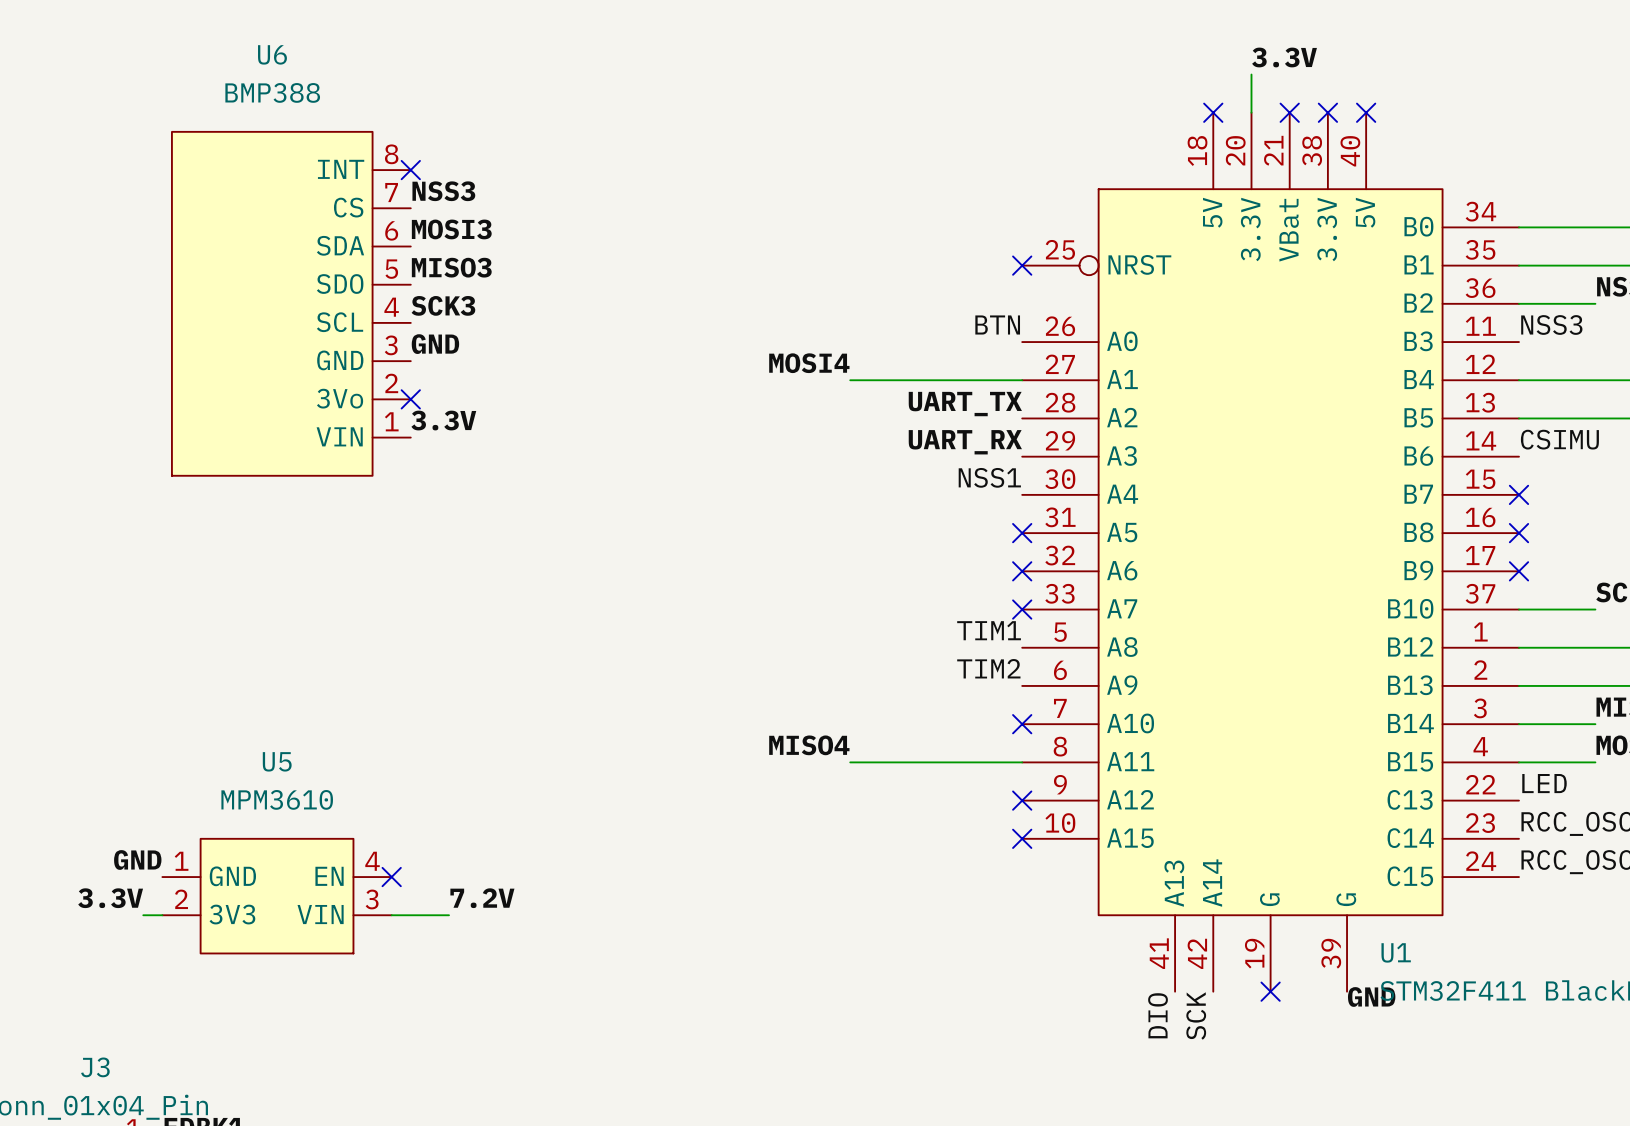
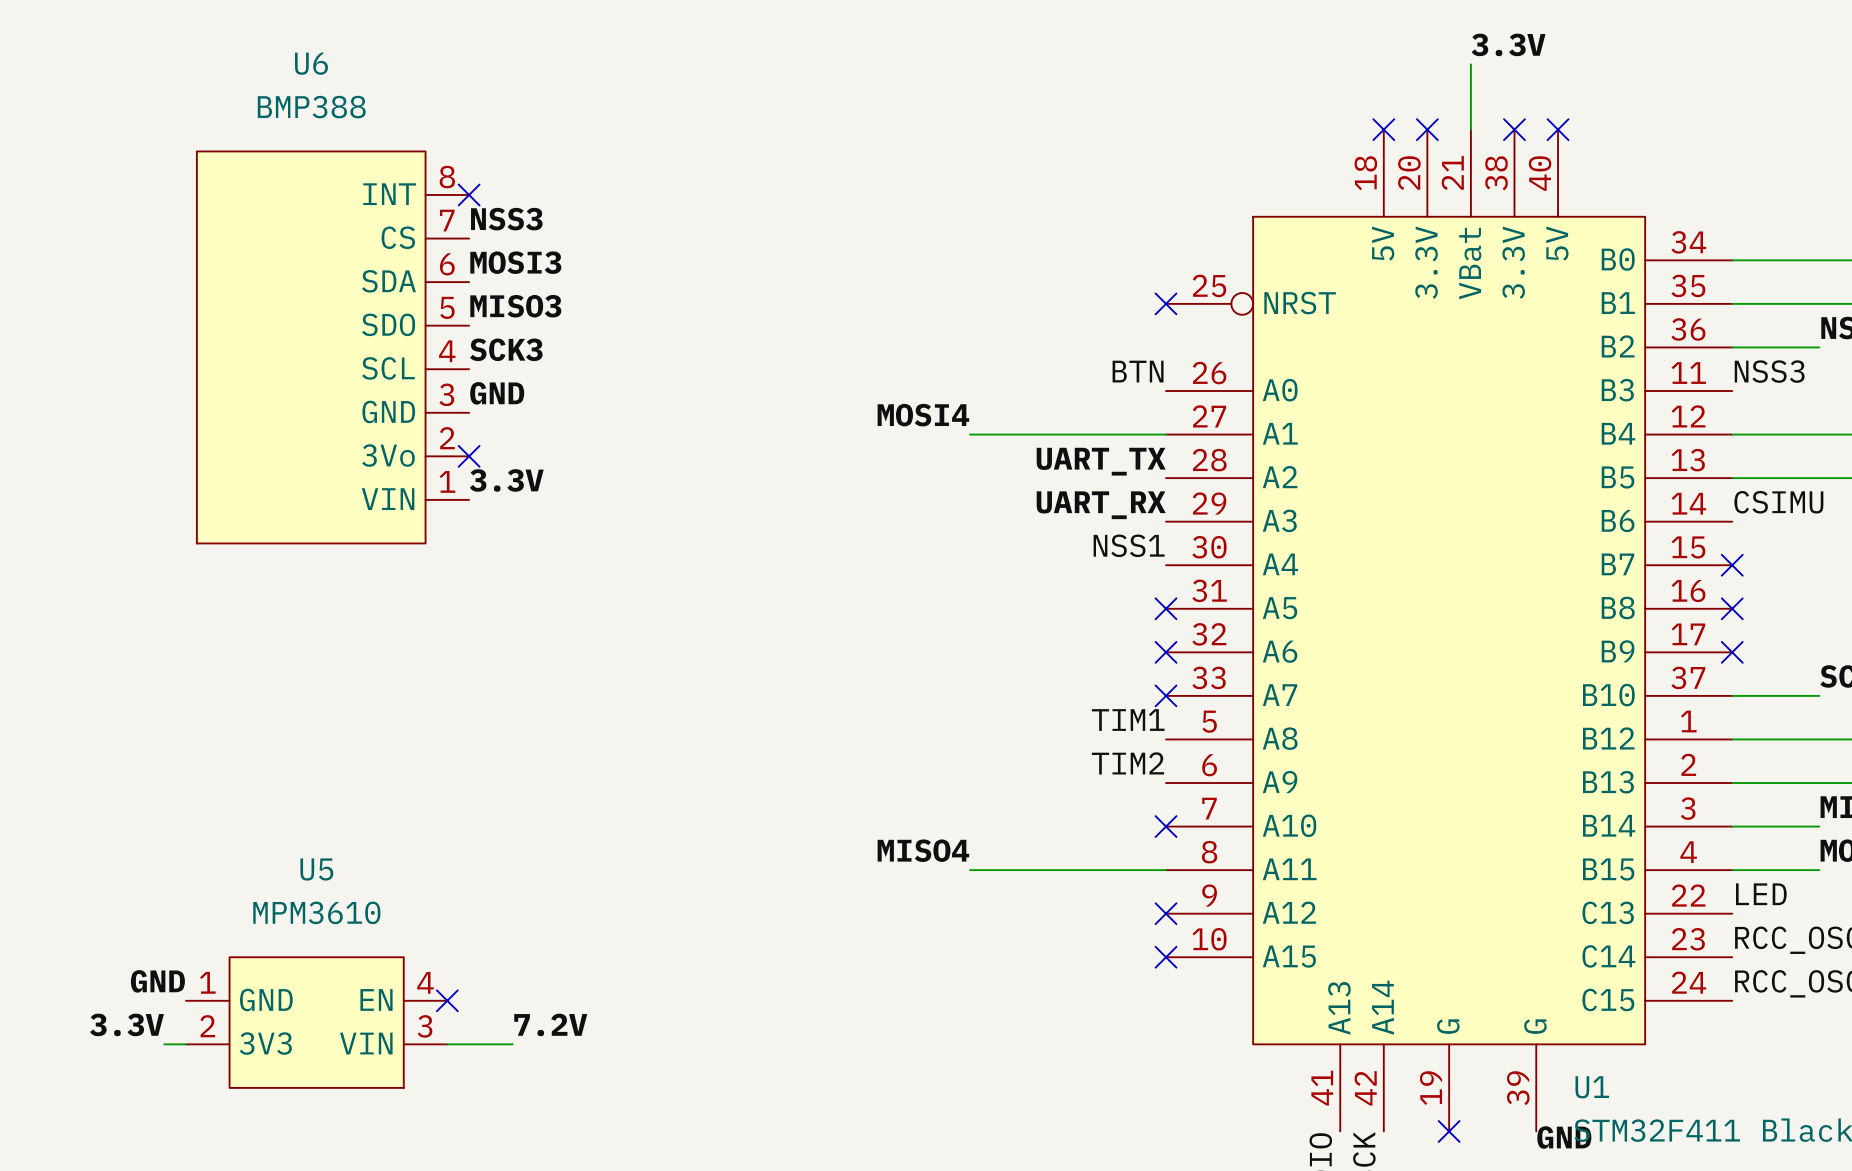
wire: none -> (1470, 64) (1470, 129)
label position: 3.3V (1284, 57) -> 3.3V (1508, 44)
wire: (1251, 74) (1251, 112) -> none
no-connect mark position: (1289, 112) -> (1427, 129)

